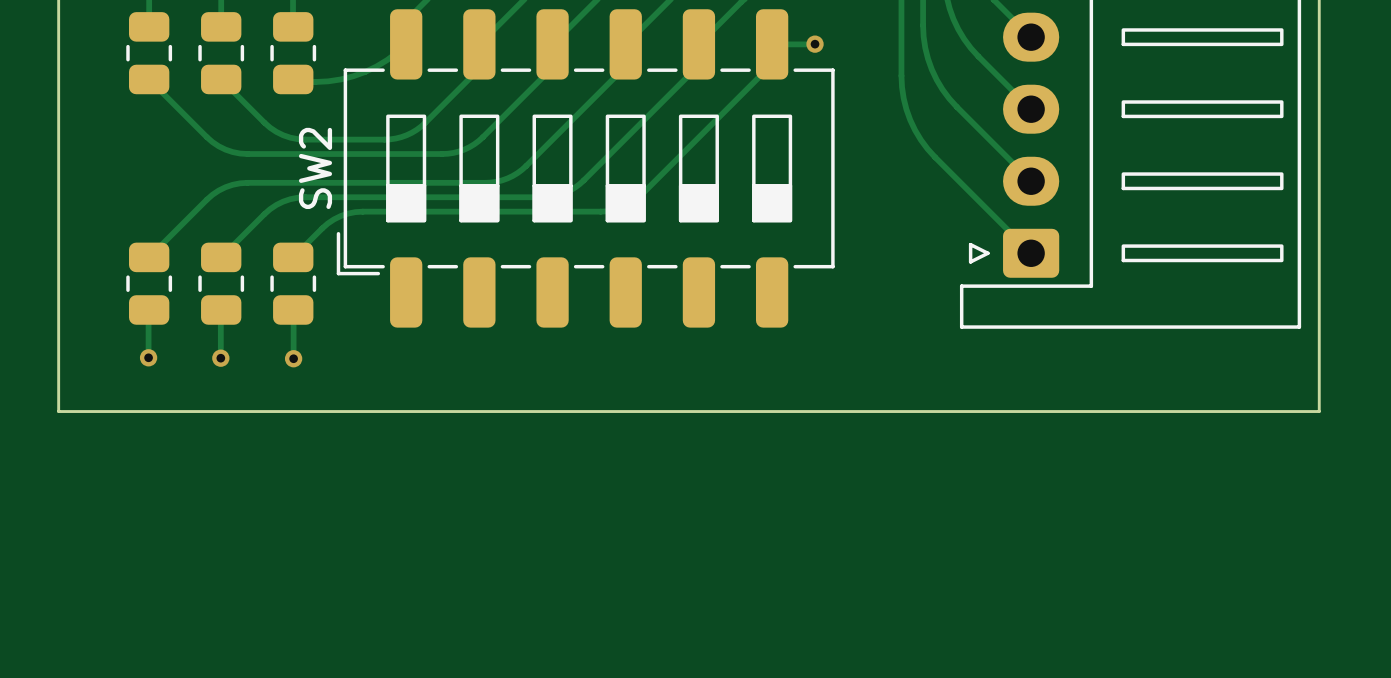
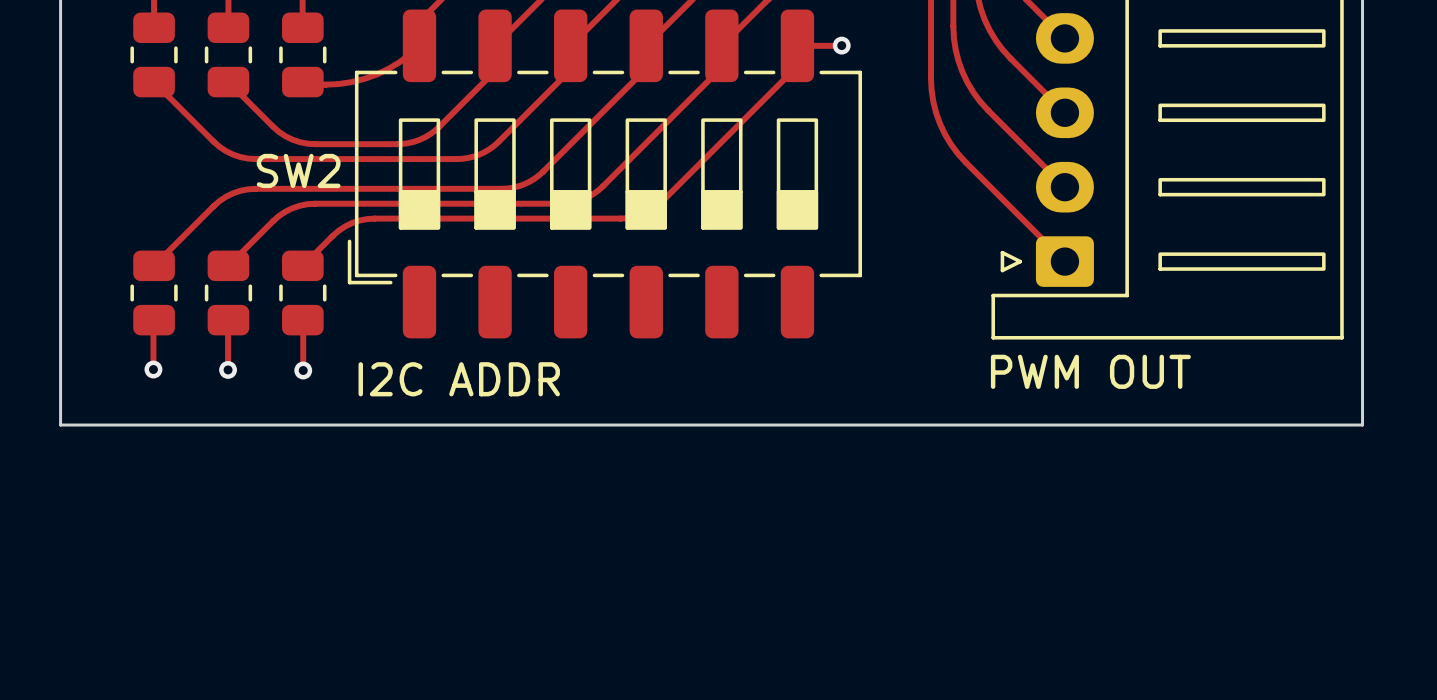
SW2 name rotation: 0° (315, 168) -> 90° clockwise (298, 170)
text: none -> PWM OUT (1090, 371)
text: none -> I2C ADDR (459, 379)

